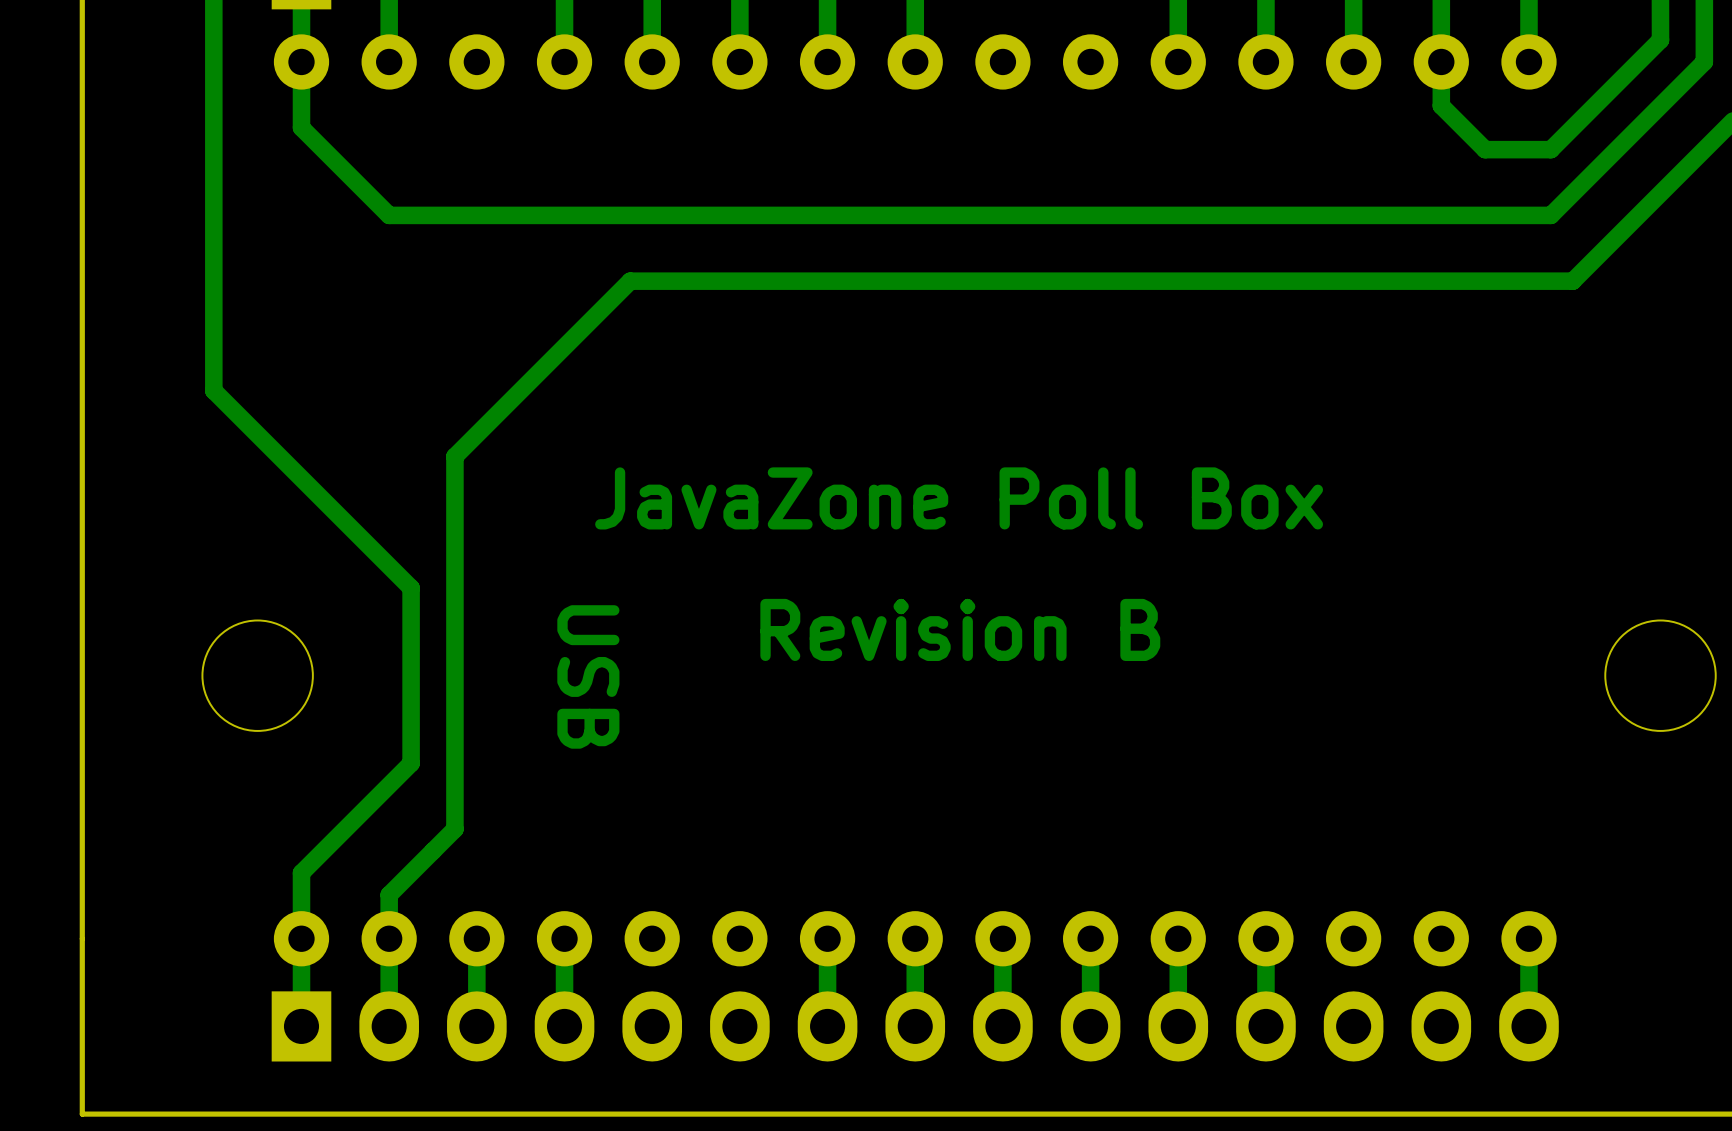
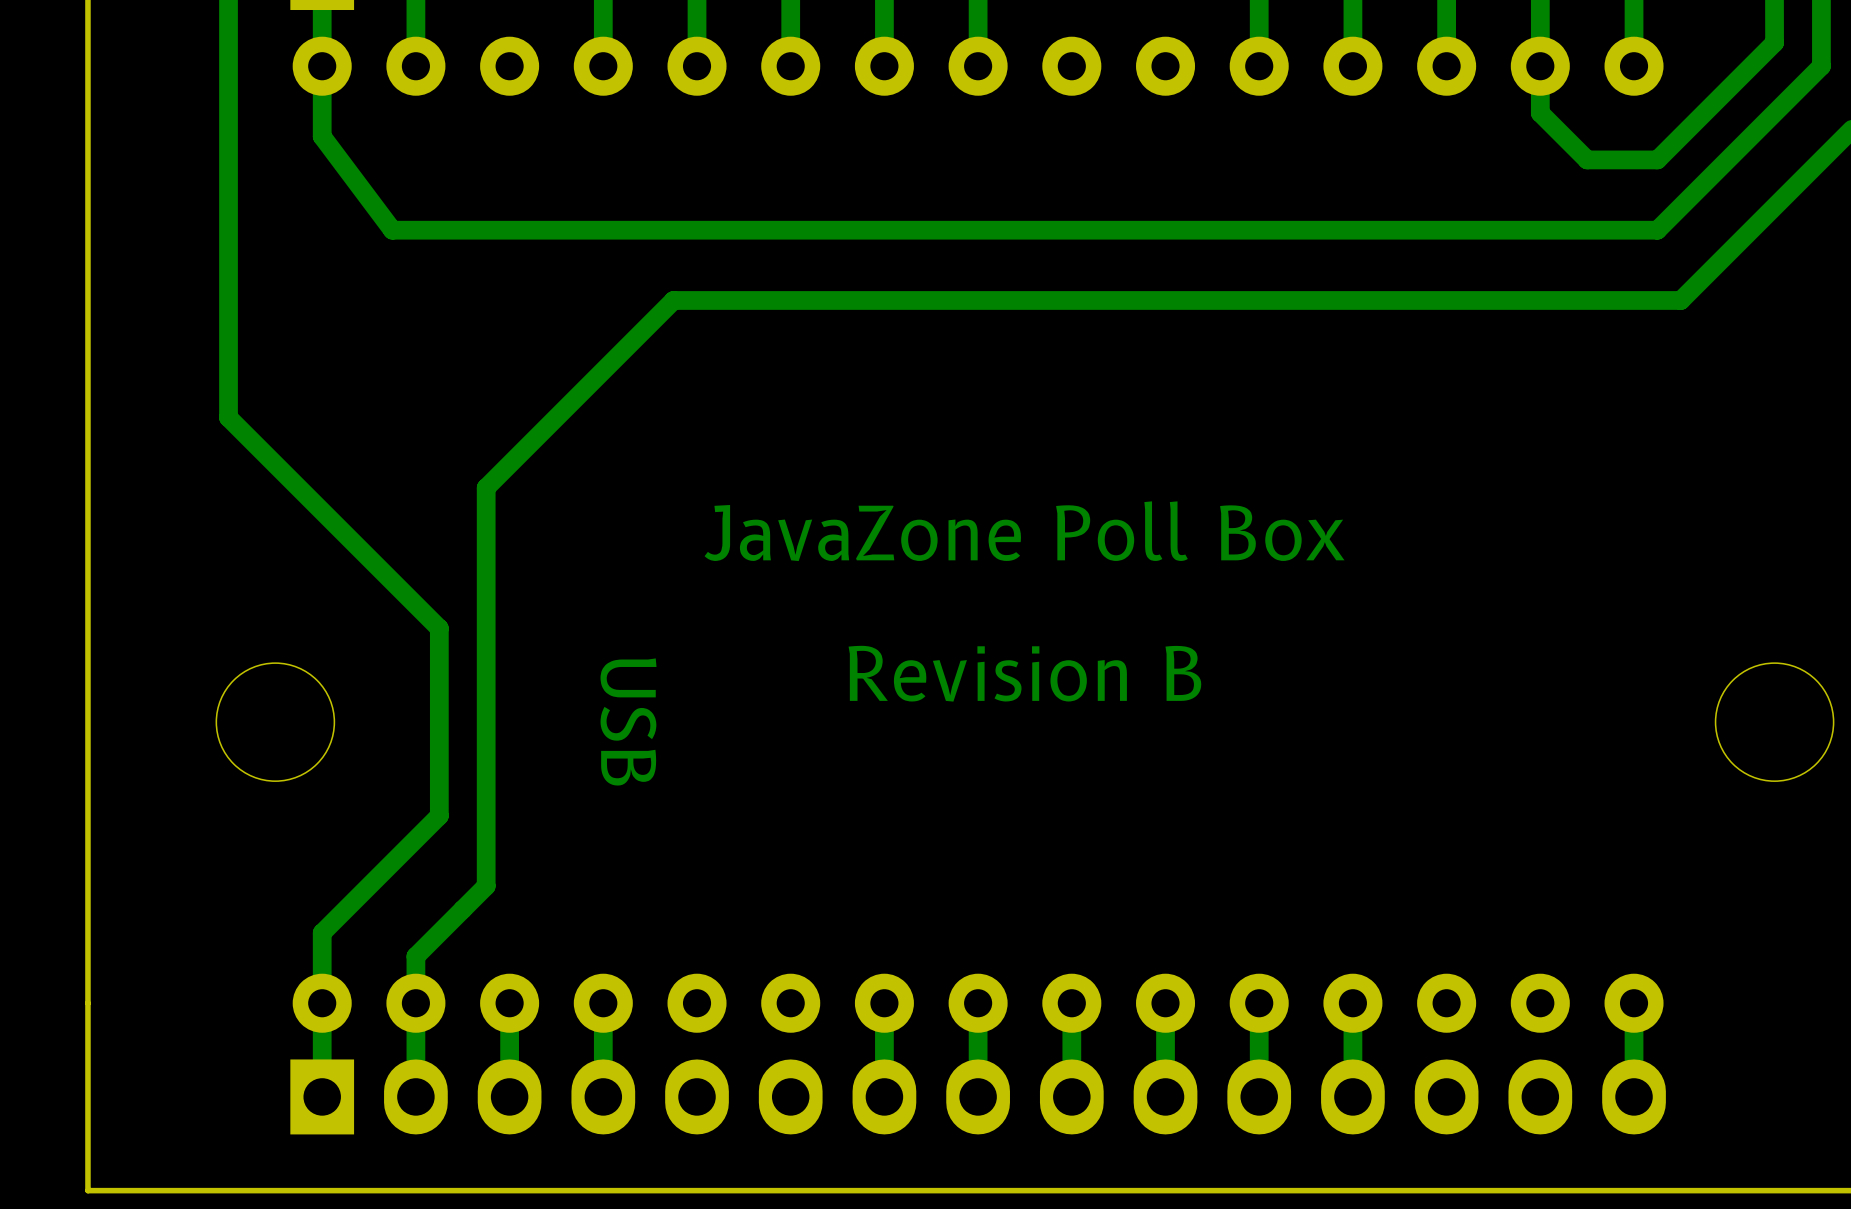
track: (301, 127) (389, 215) -> (322, 136) (392, 230) (415, 230)

